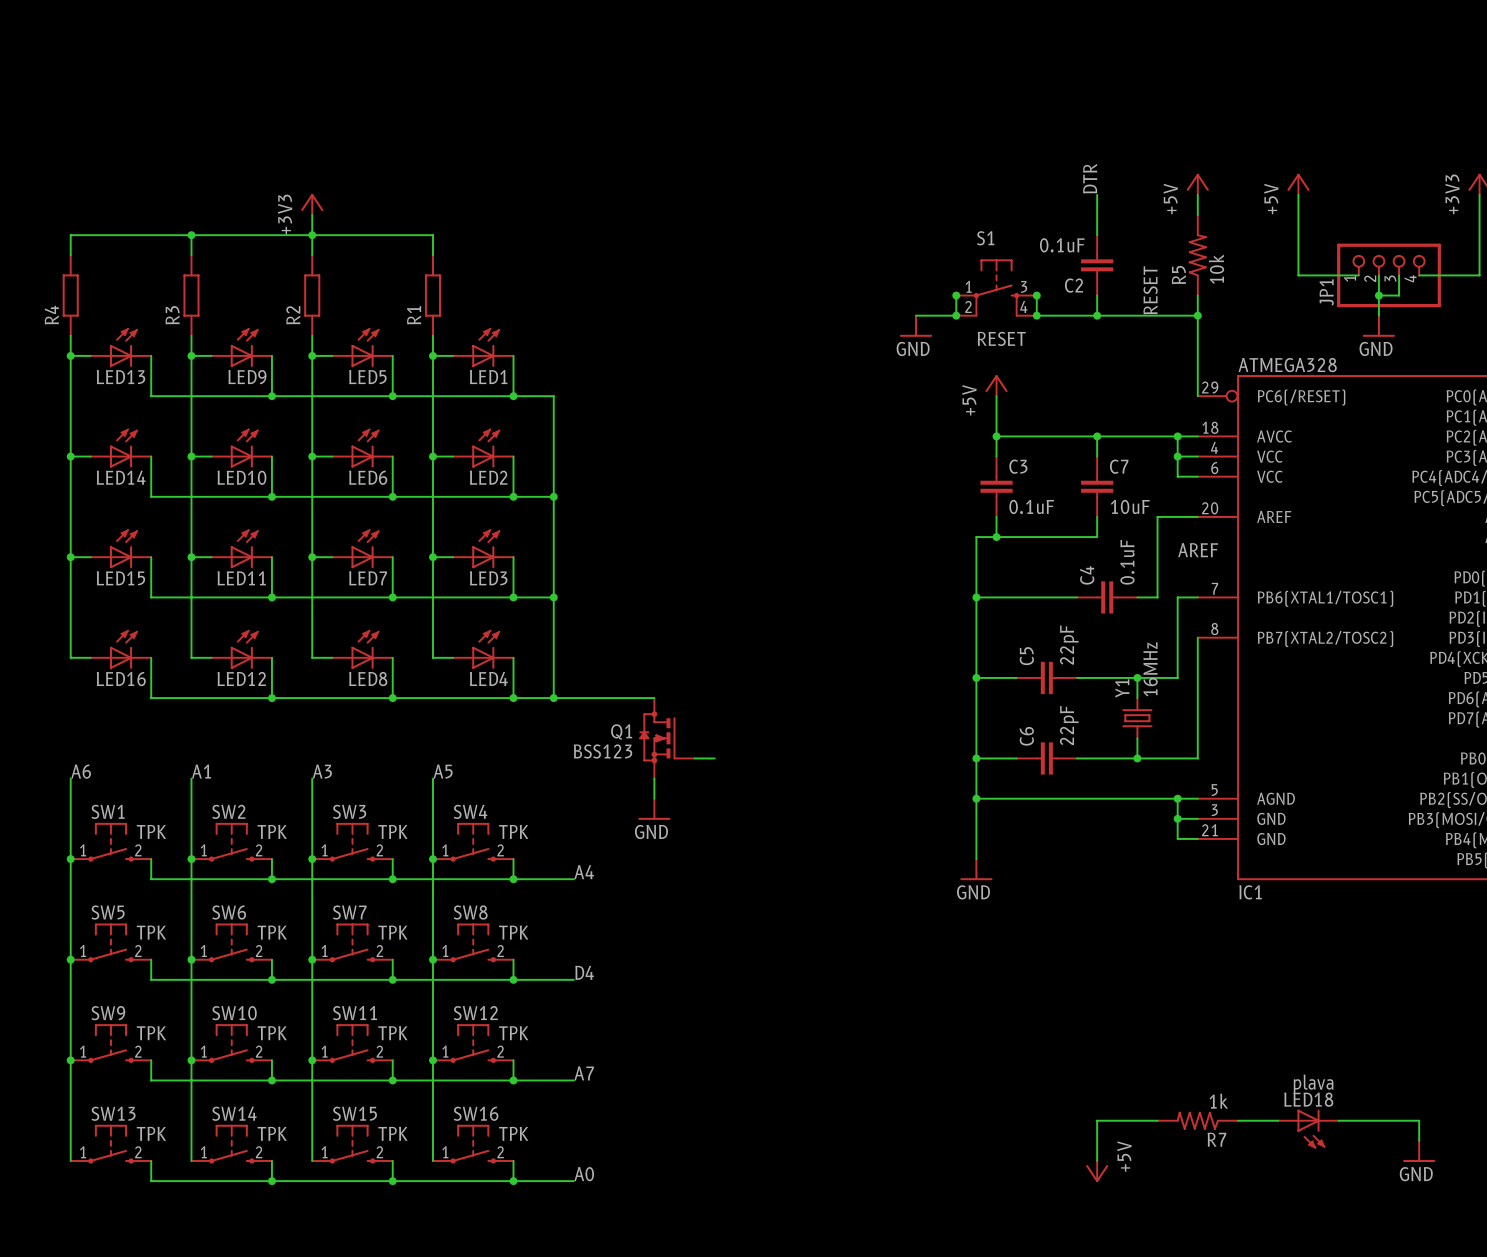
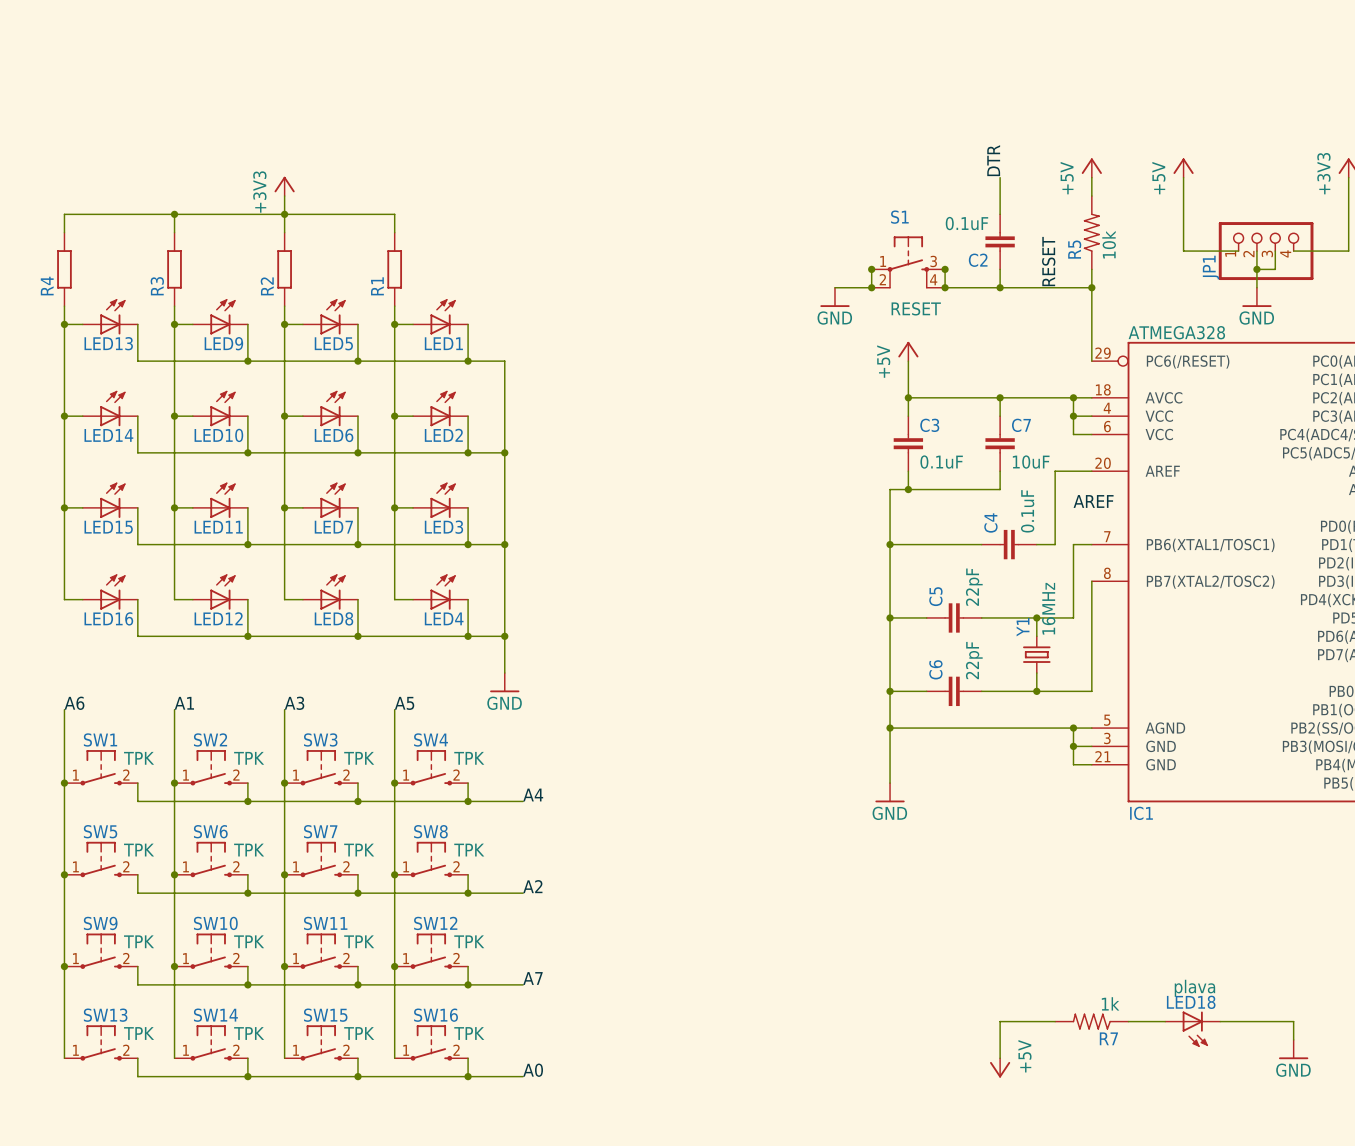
wire: (553, 698) (654, 698) -> (504, 636) (504, 673)
Q1: BSS123 (667, 738) -> none
wire: (694, 758) (714, 758) -> none
wire: (654, 778) (654, 798) -> none
power symbol position: GND (654, 809) -> GND (504, 682)
label: D4 (584, 972) -> A2 (532, 886)

